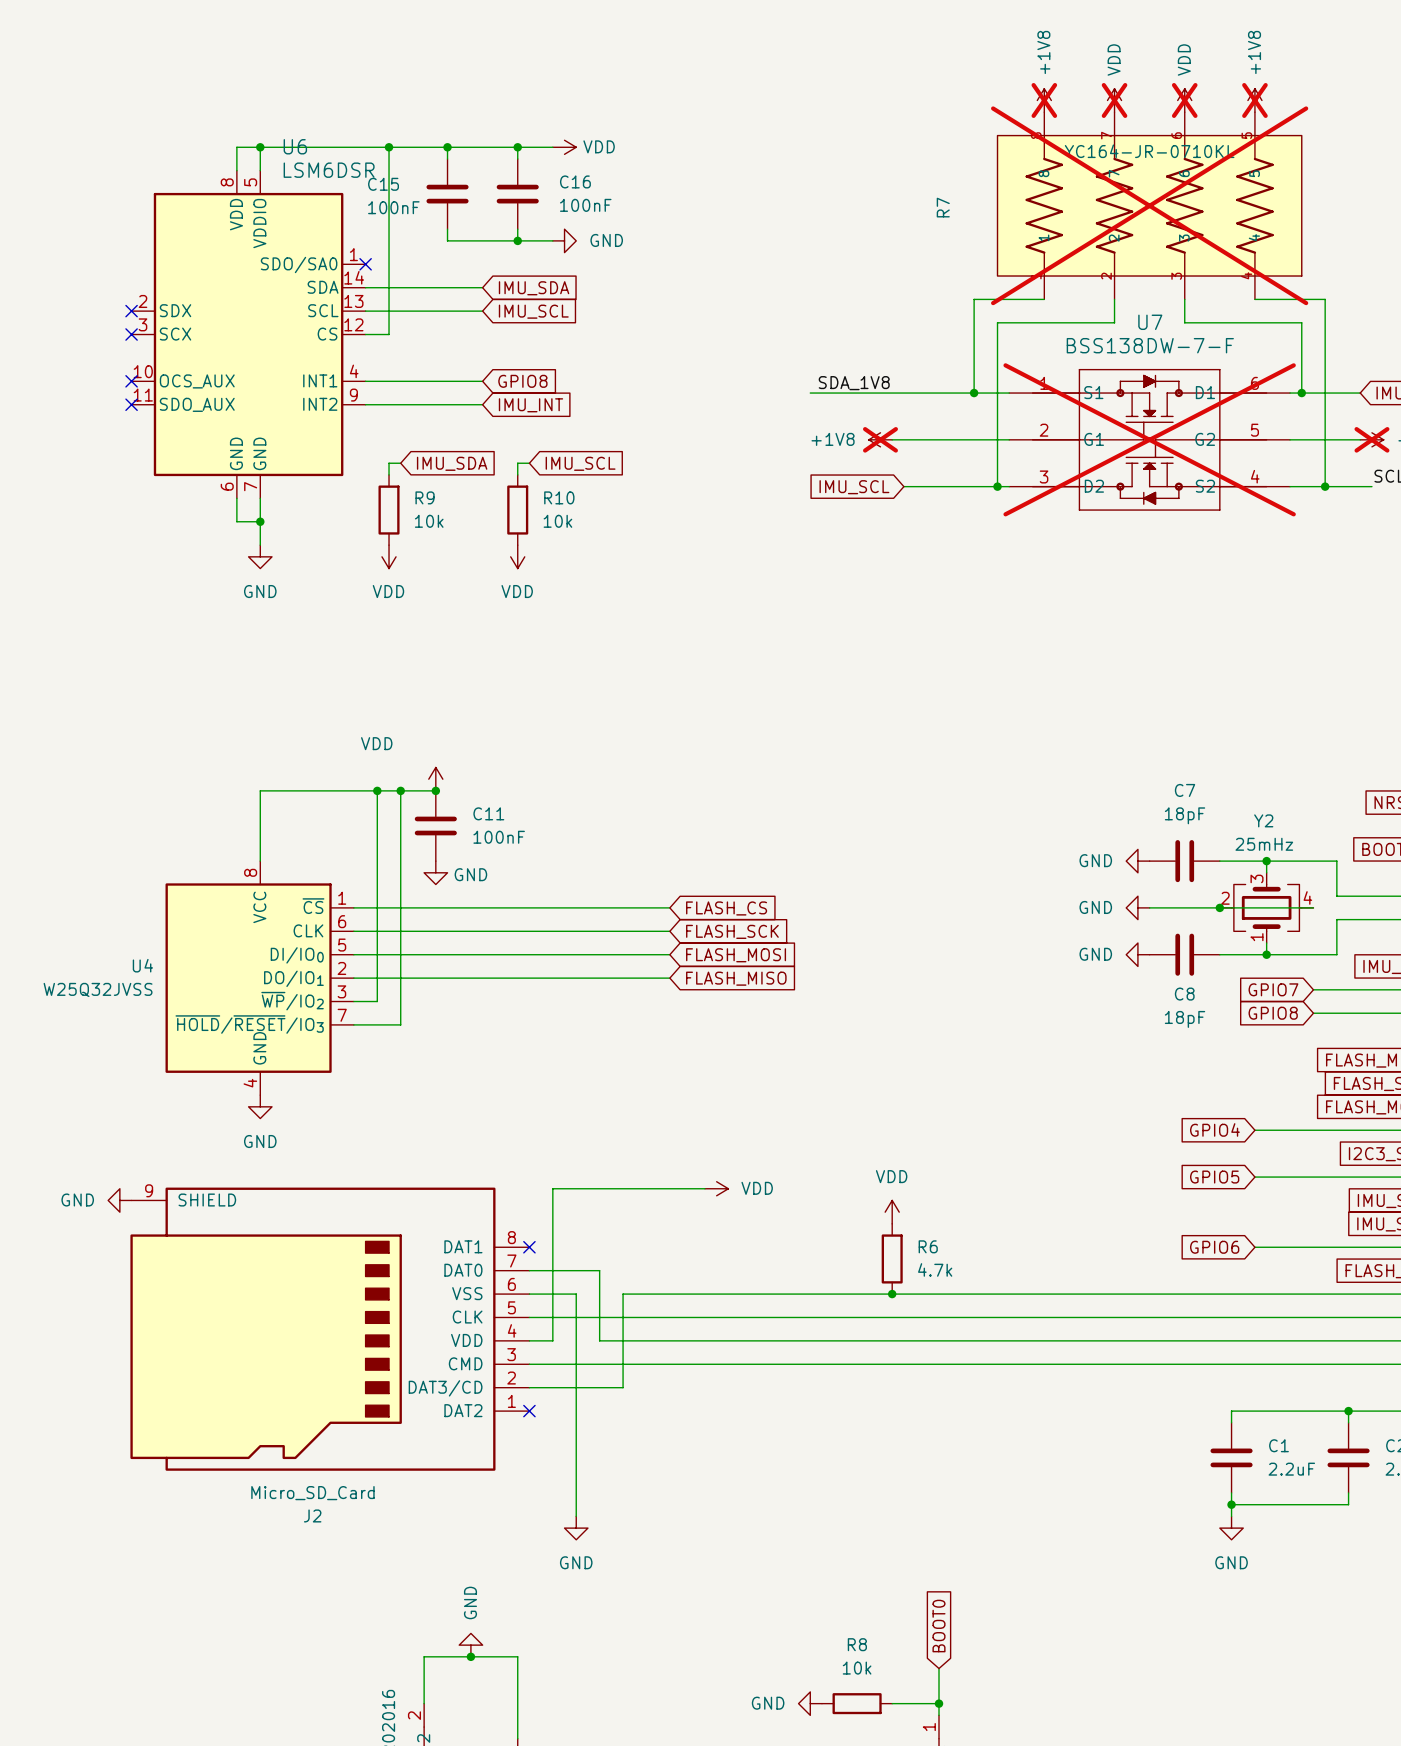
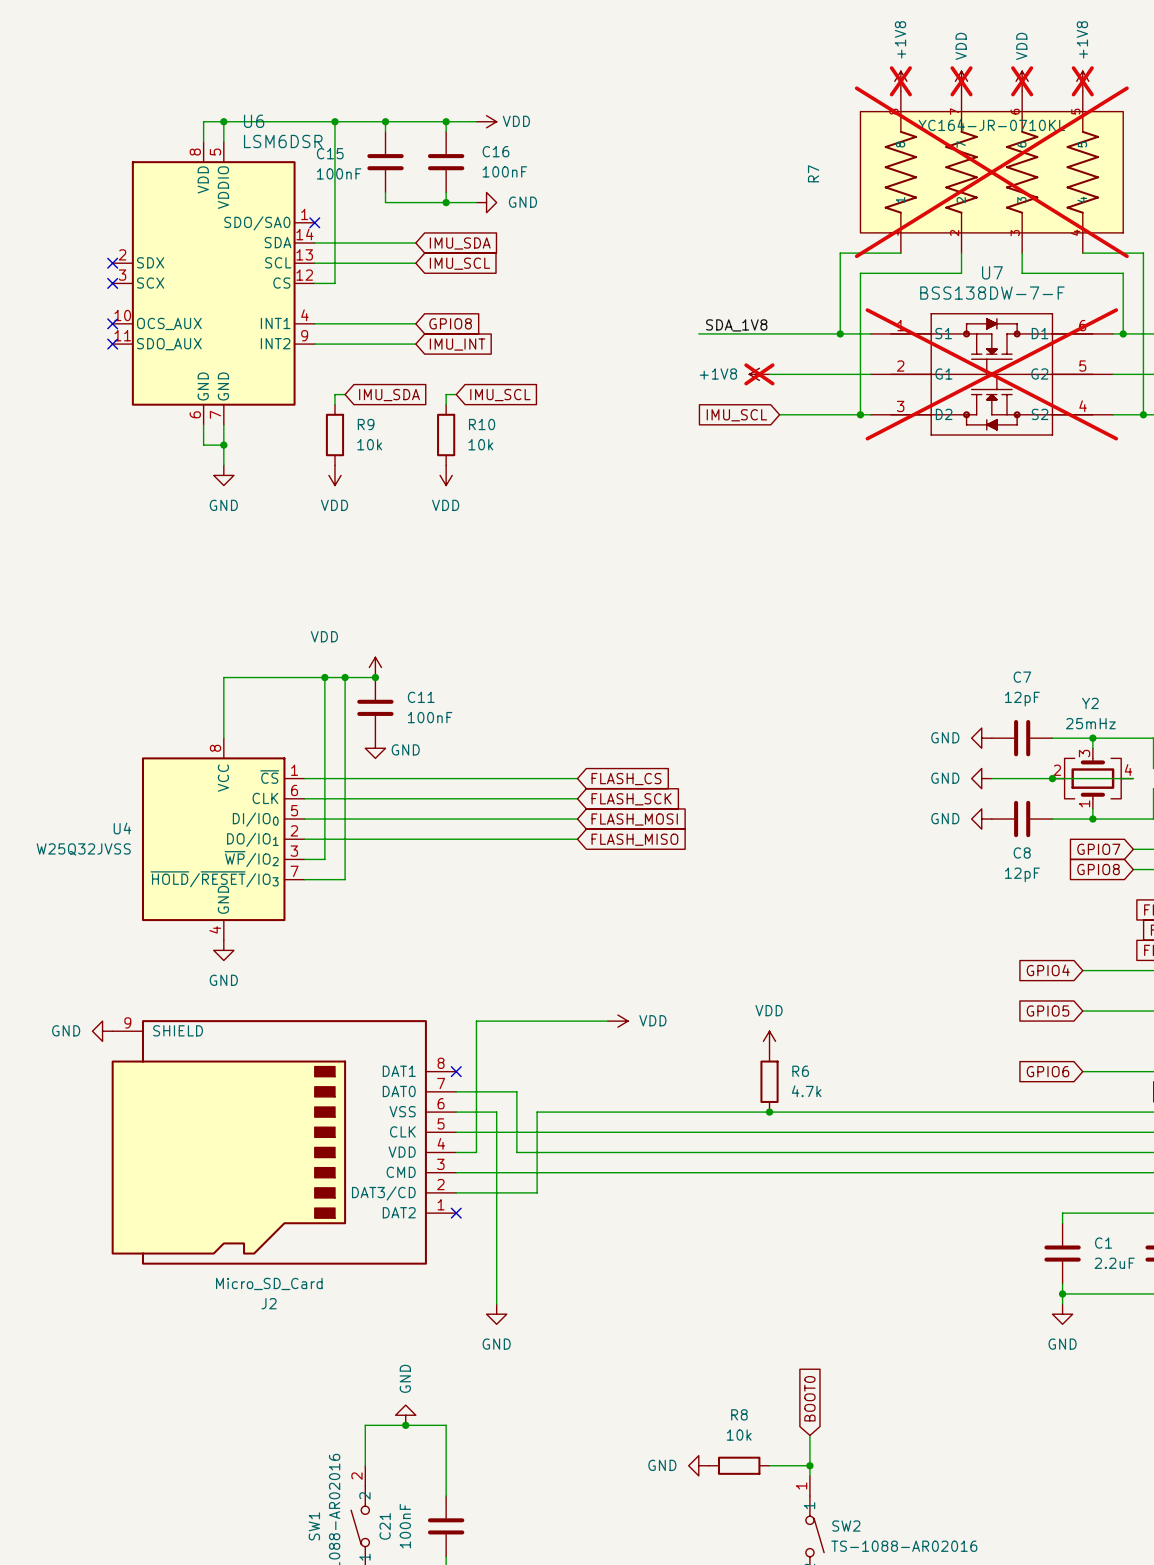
C7 value: 18pF (1185, 815) -> 12pF (1022, 699)
C8 value: 18pF (1185, 1019) -> 12pF (1022, 874)

